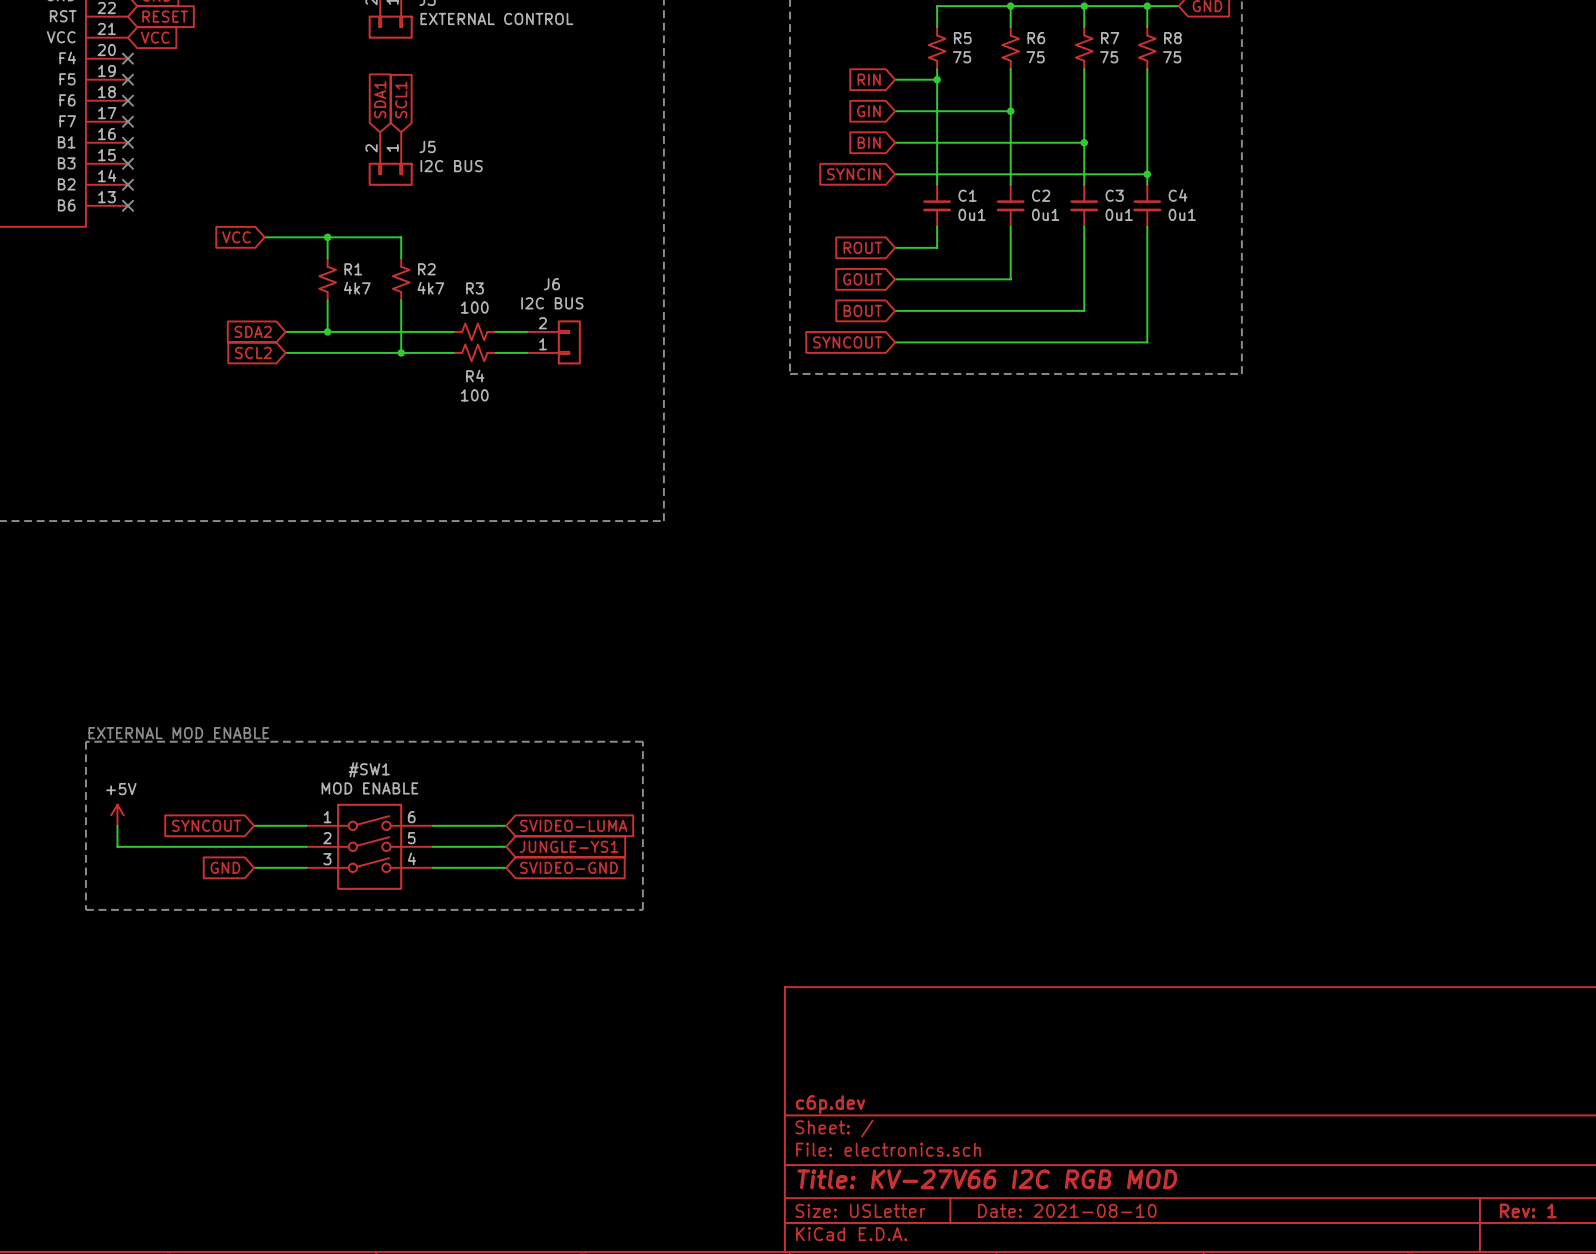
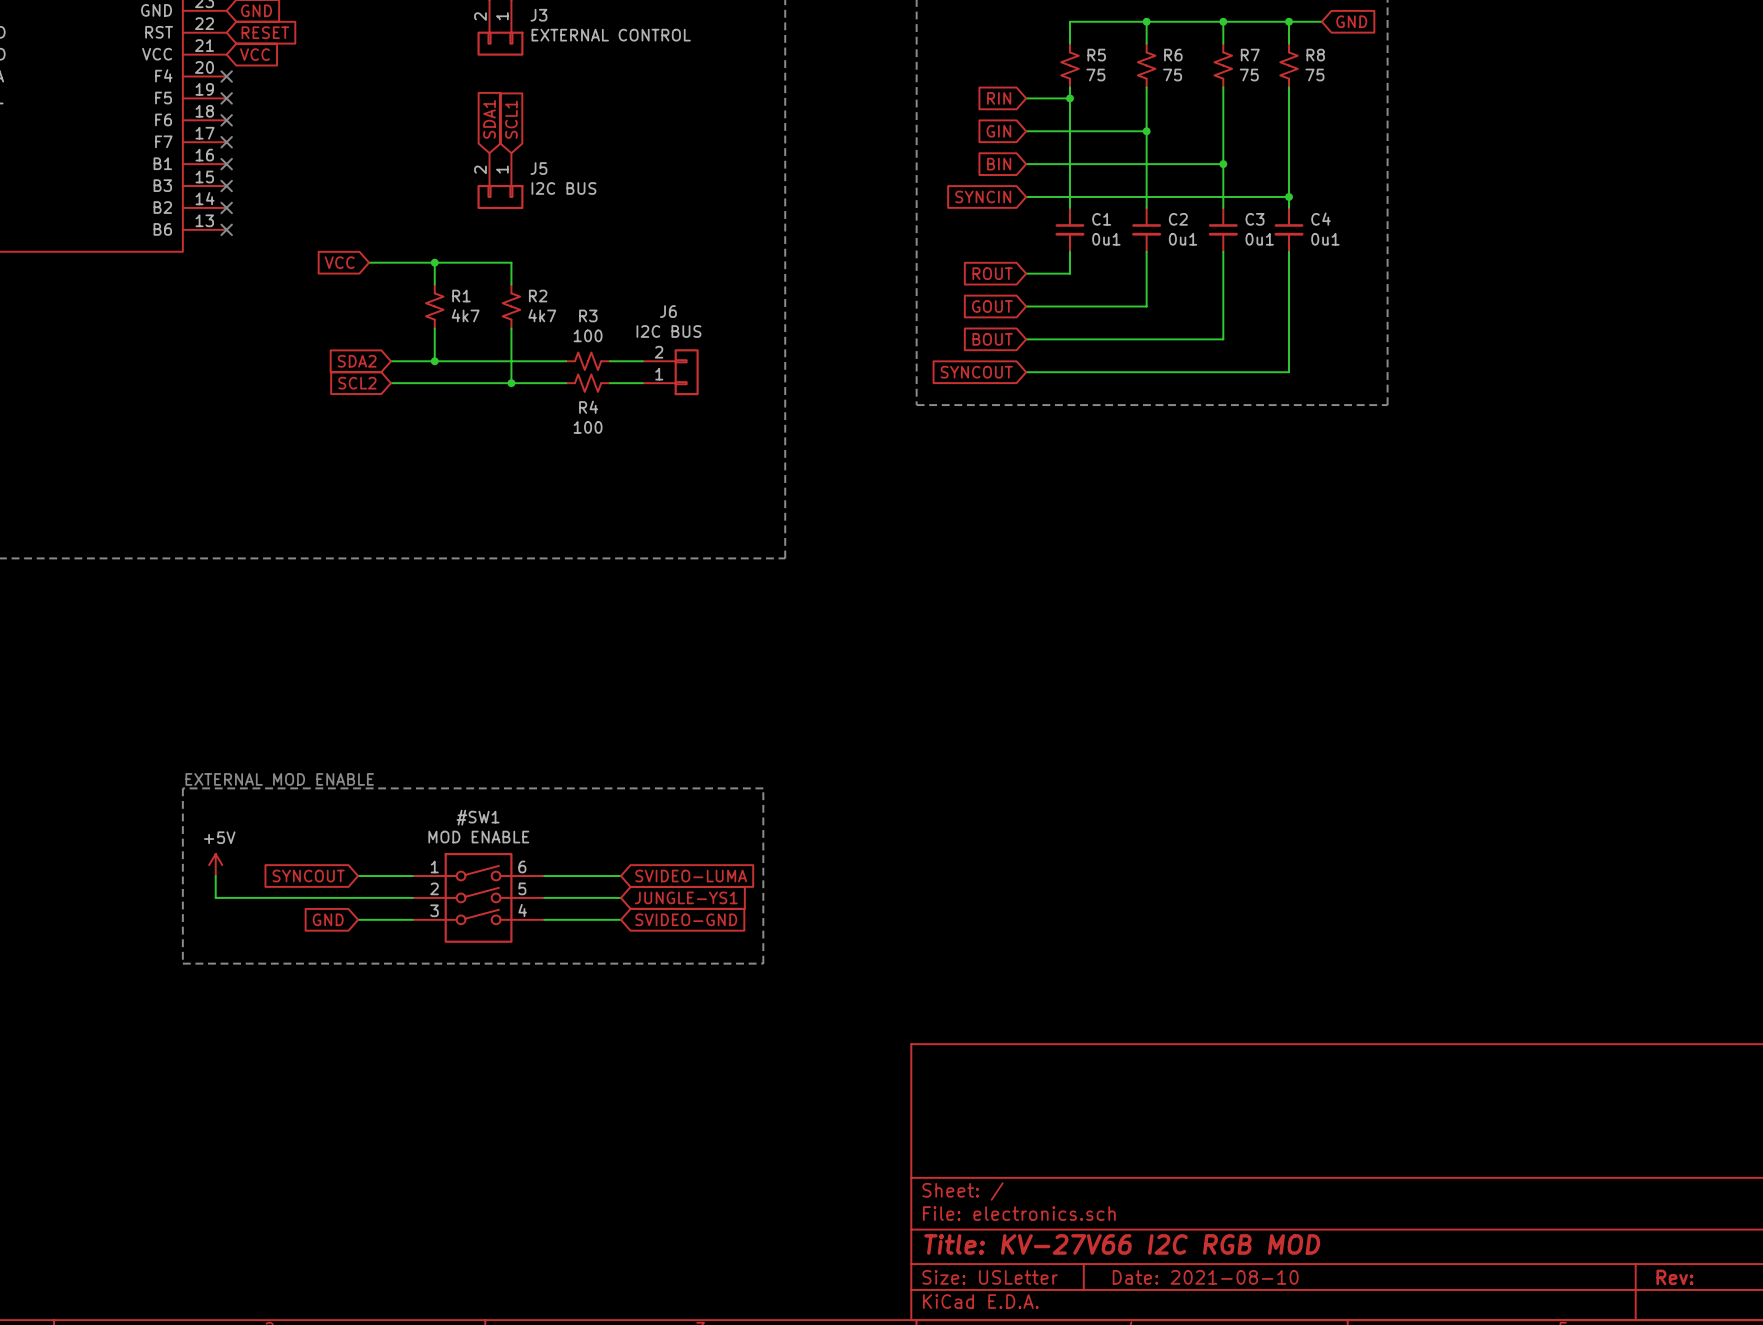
title block: c6p.dev (830, 1104) -> none
title block: Rev: 1 (1528, 1210) -> Rev: (1674, 1277)

